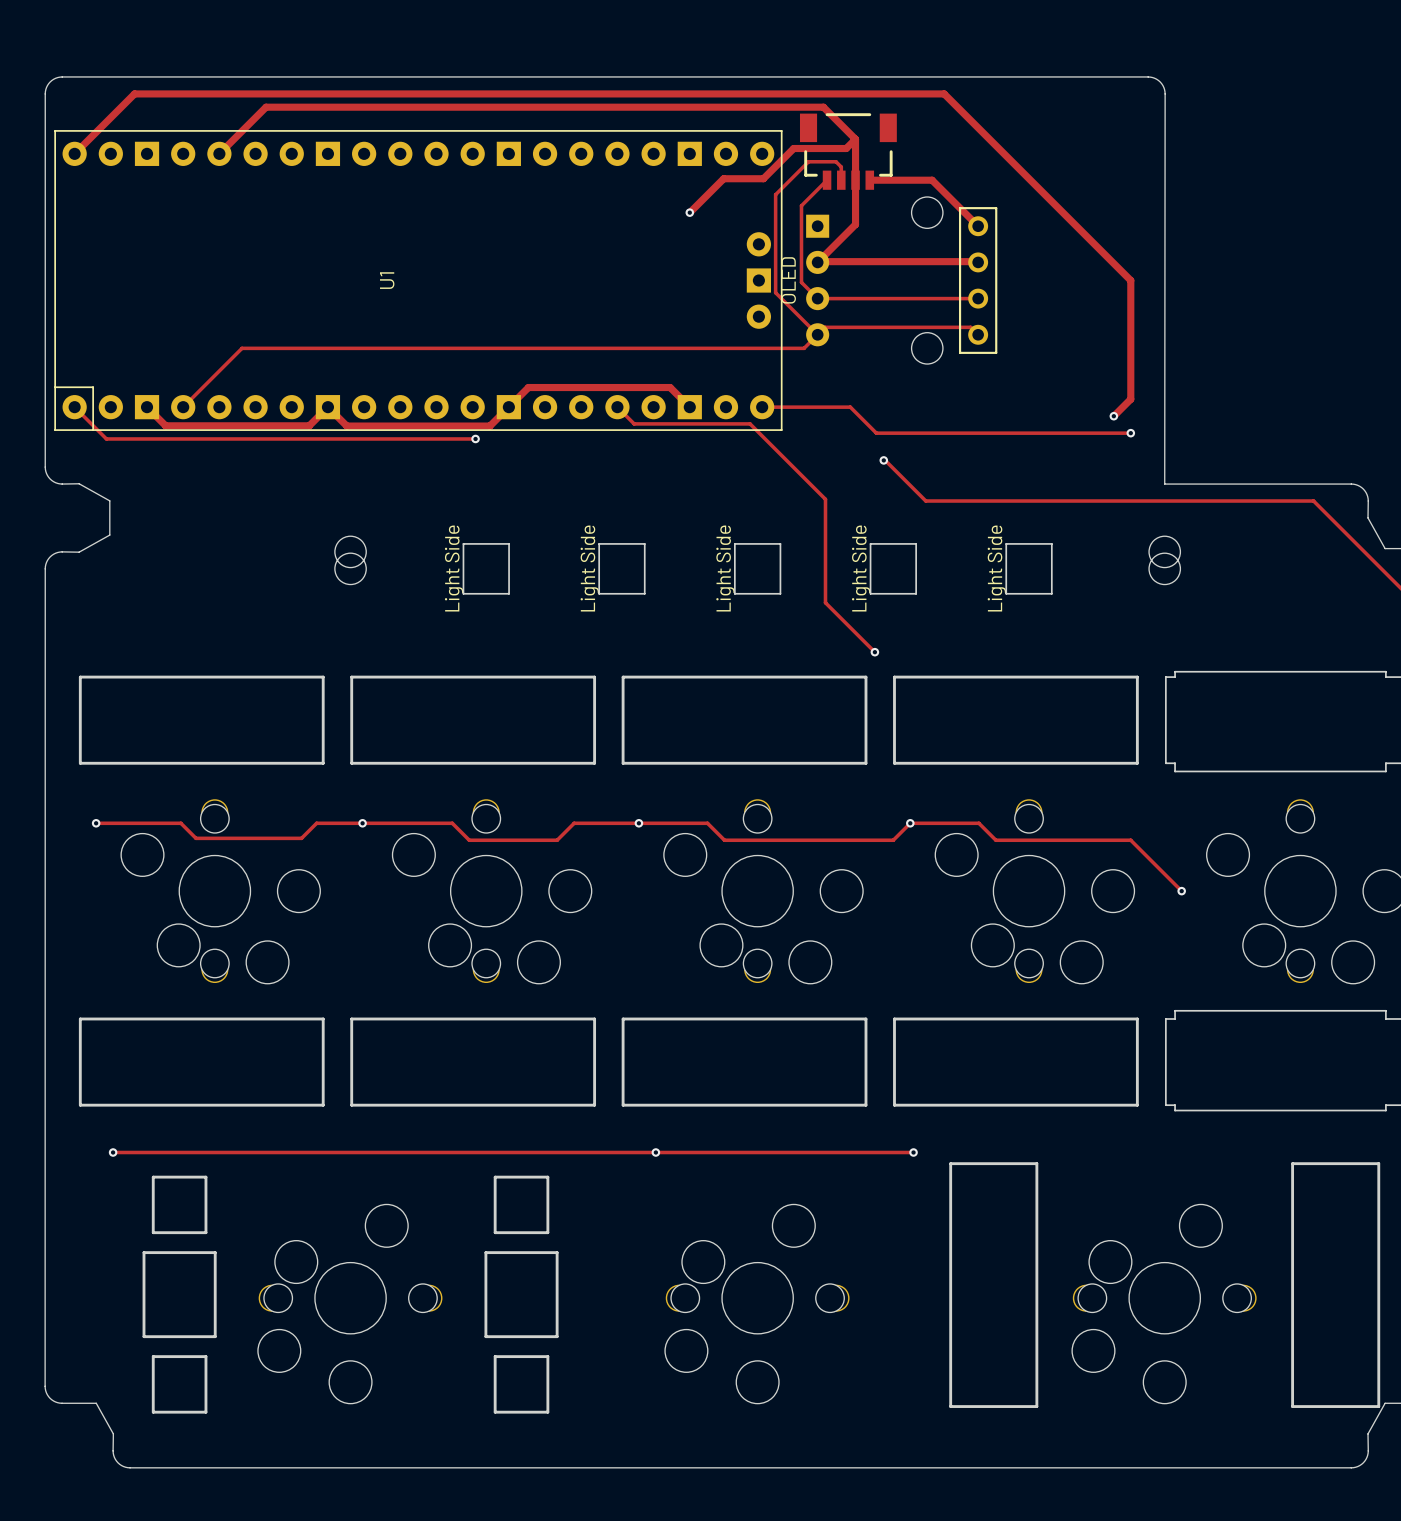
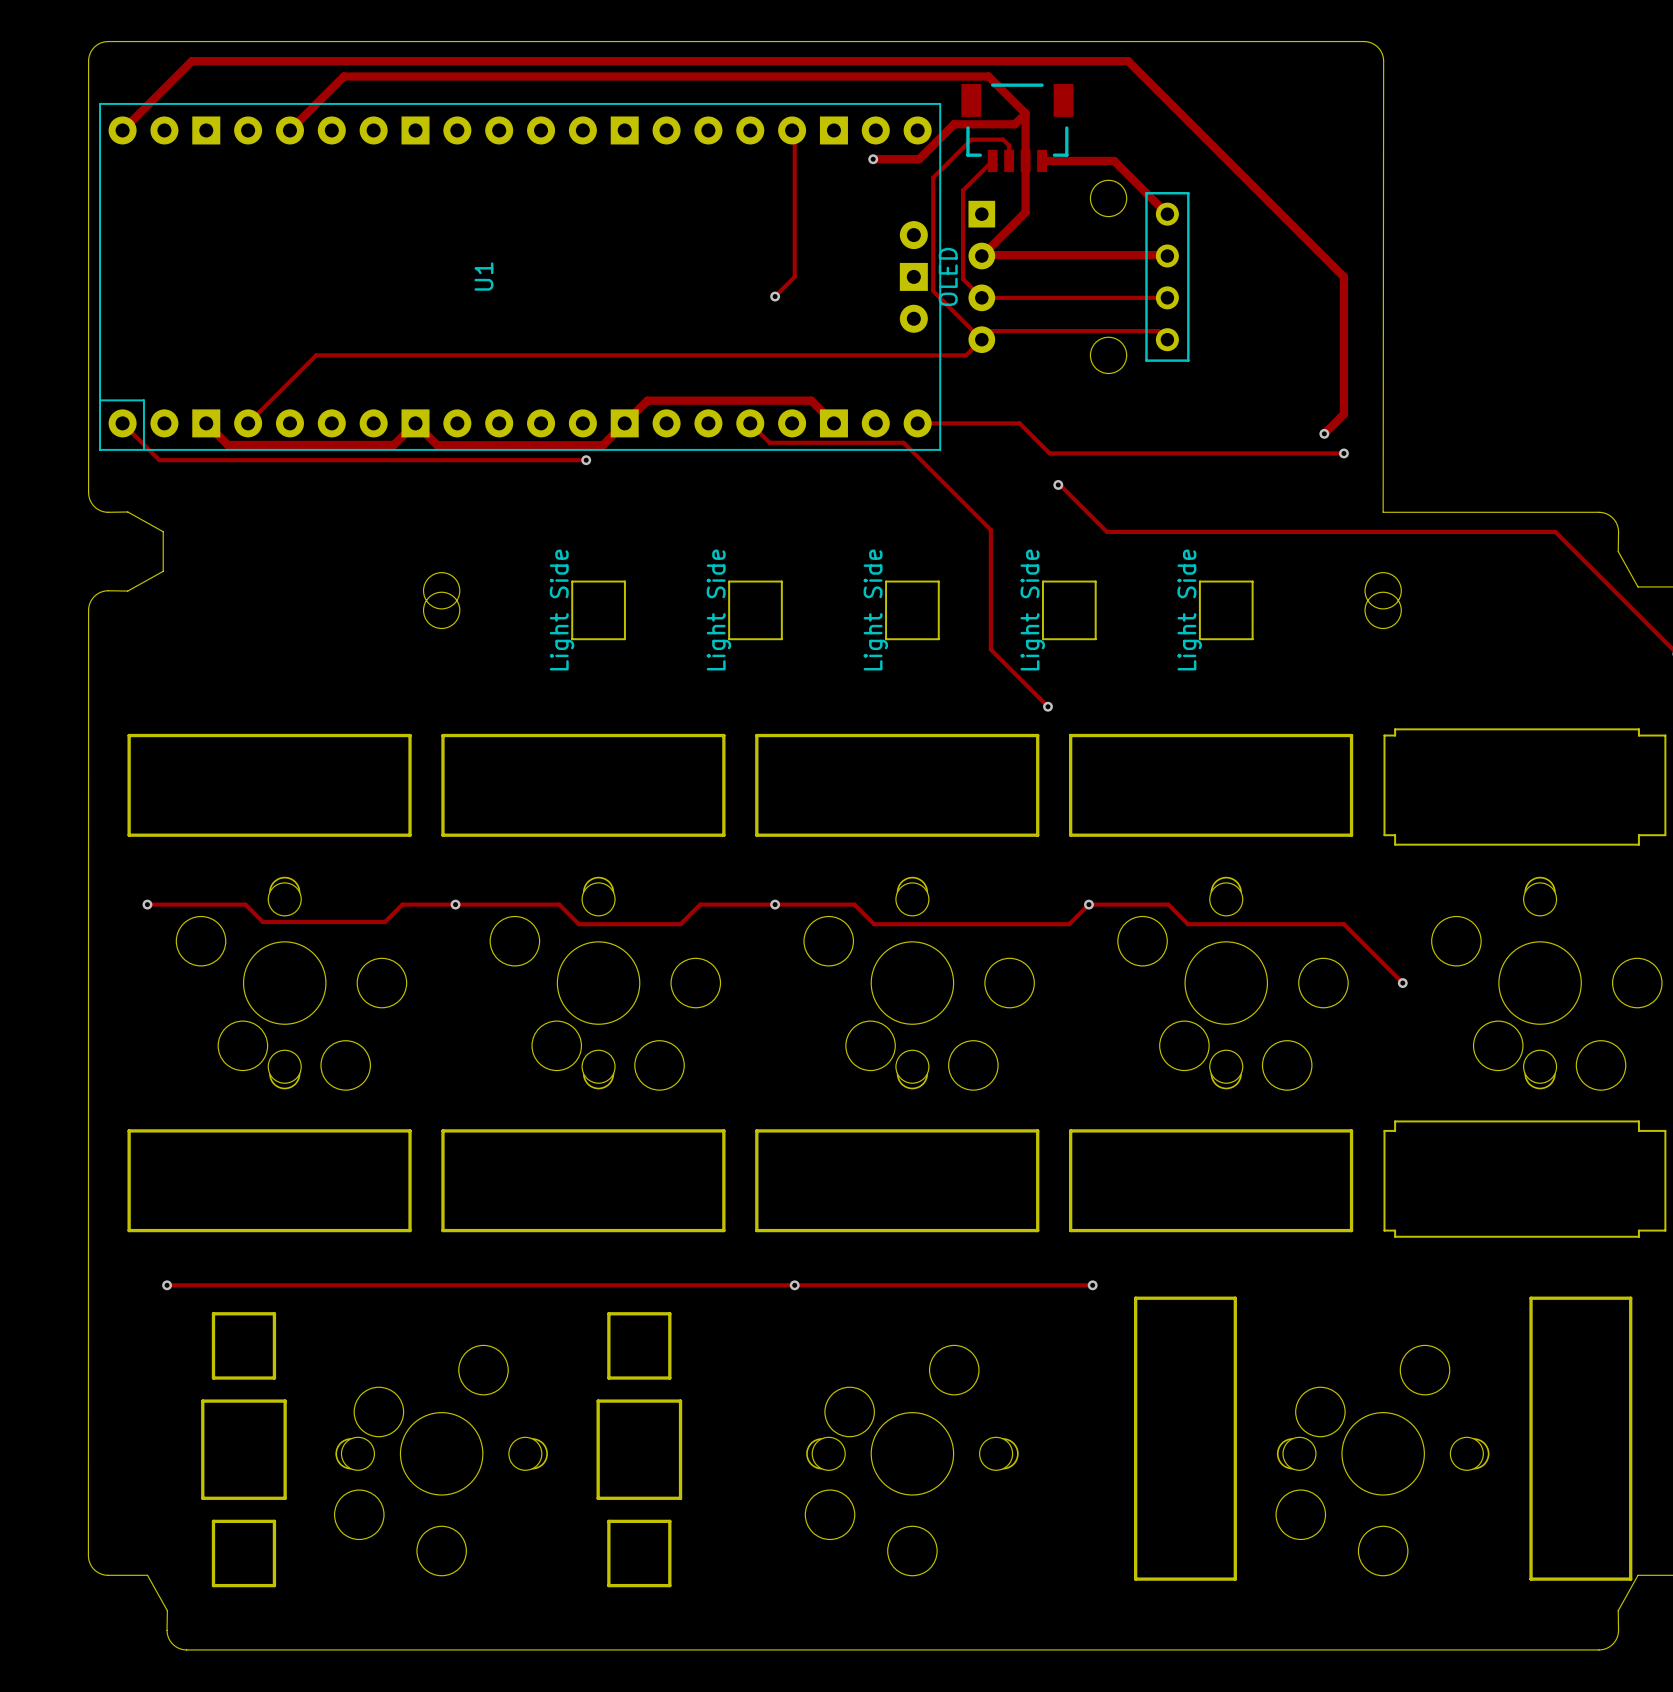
track: none -> (792, 130) (794, 133) (794, 276) (775, 296)
track: (723, 178) (689, 212) -> none
via position: (689, 212) -> (873, 159)
via: none -> (775, 296)

